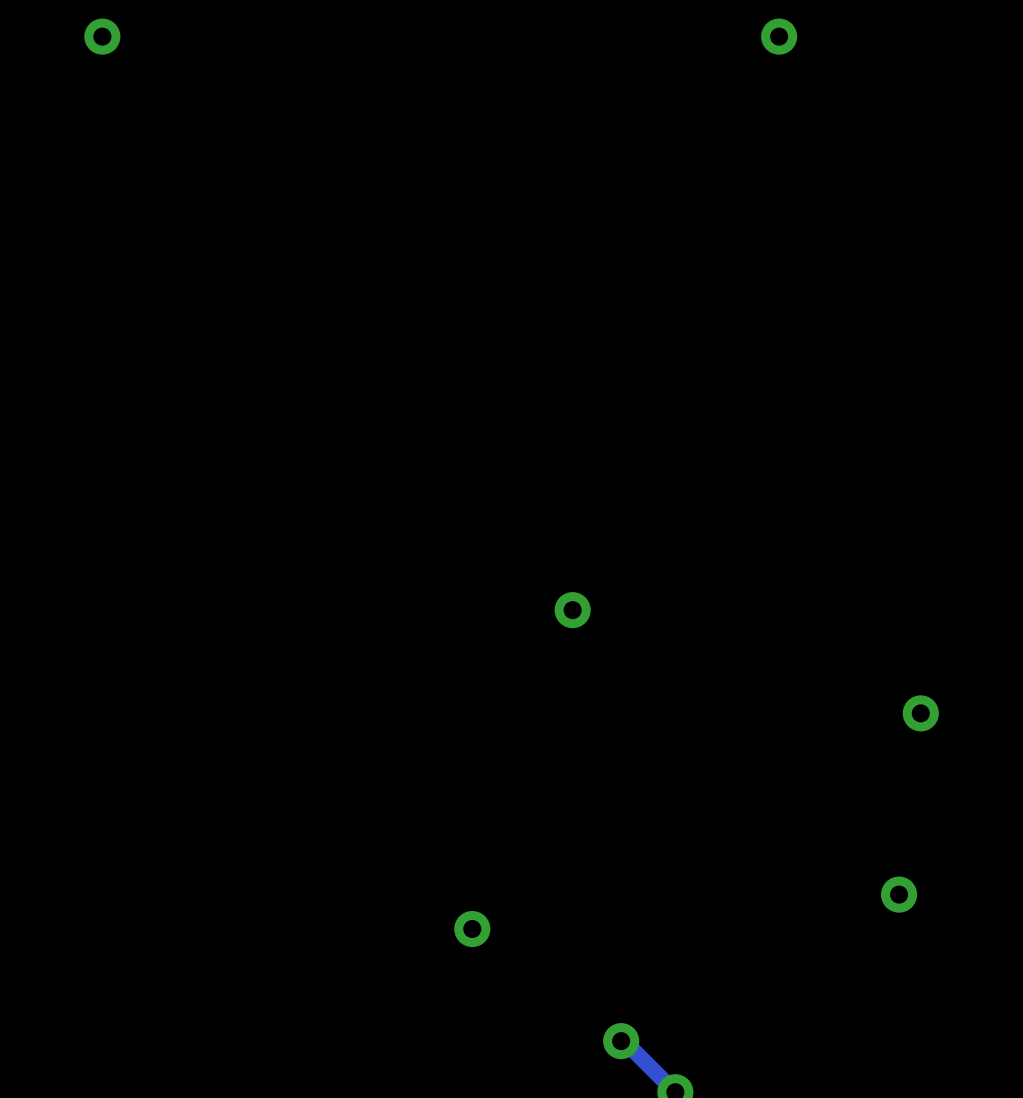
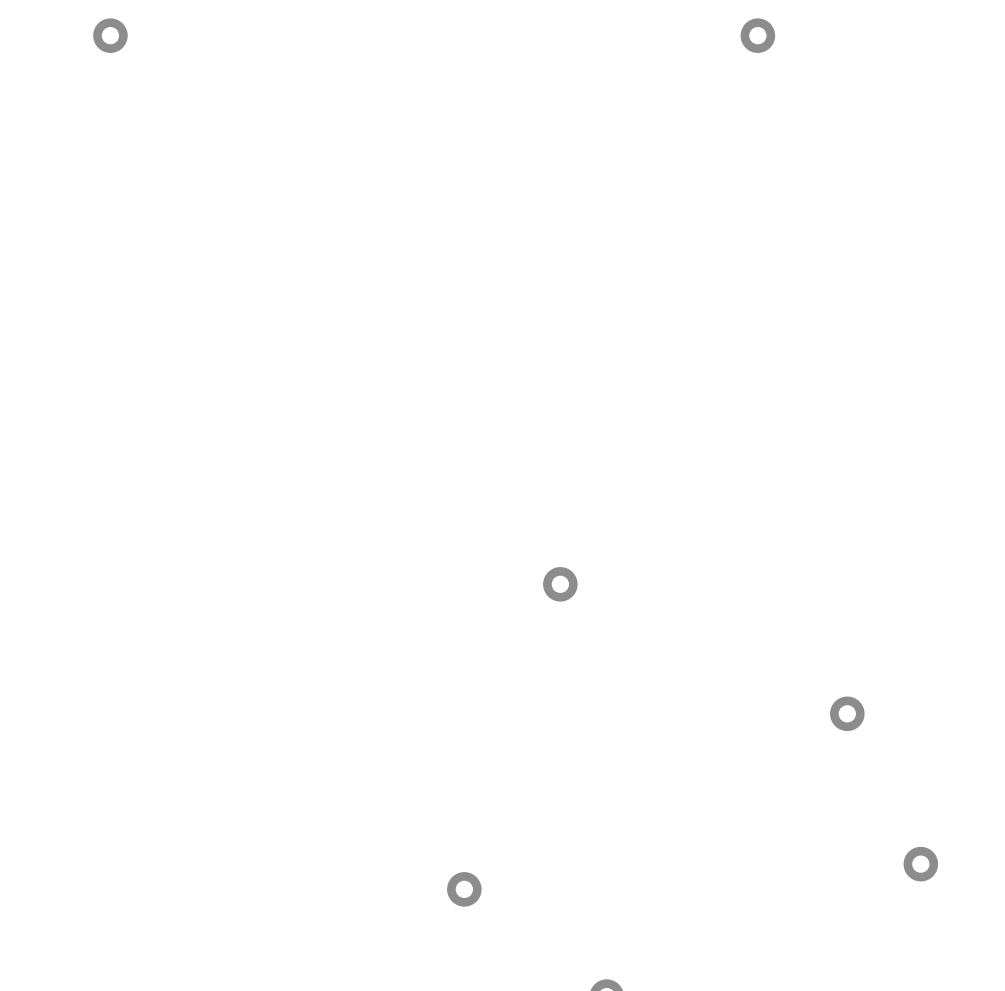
via position: (920, 713) -> (847, 713)
via position: (899, 894) -> (920, 864)

